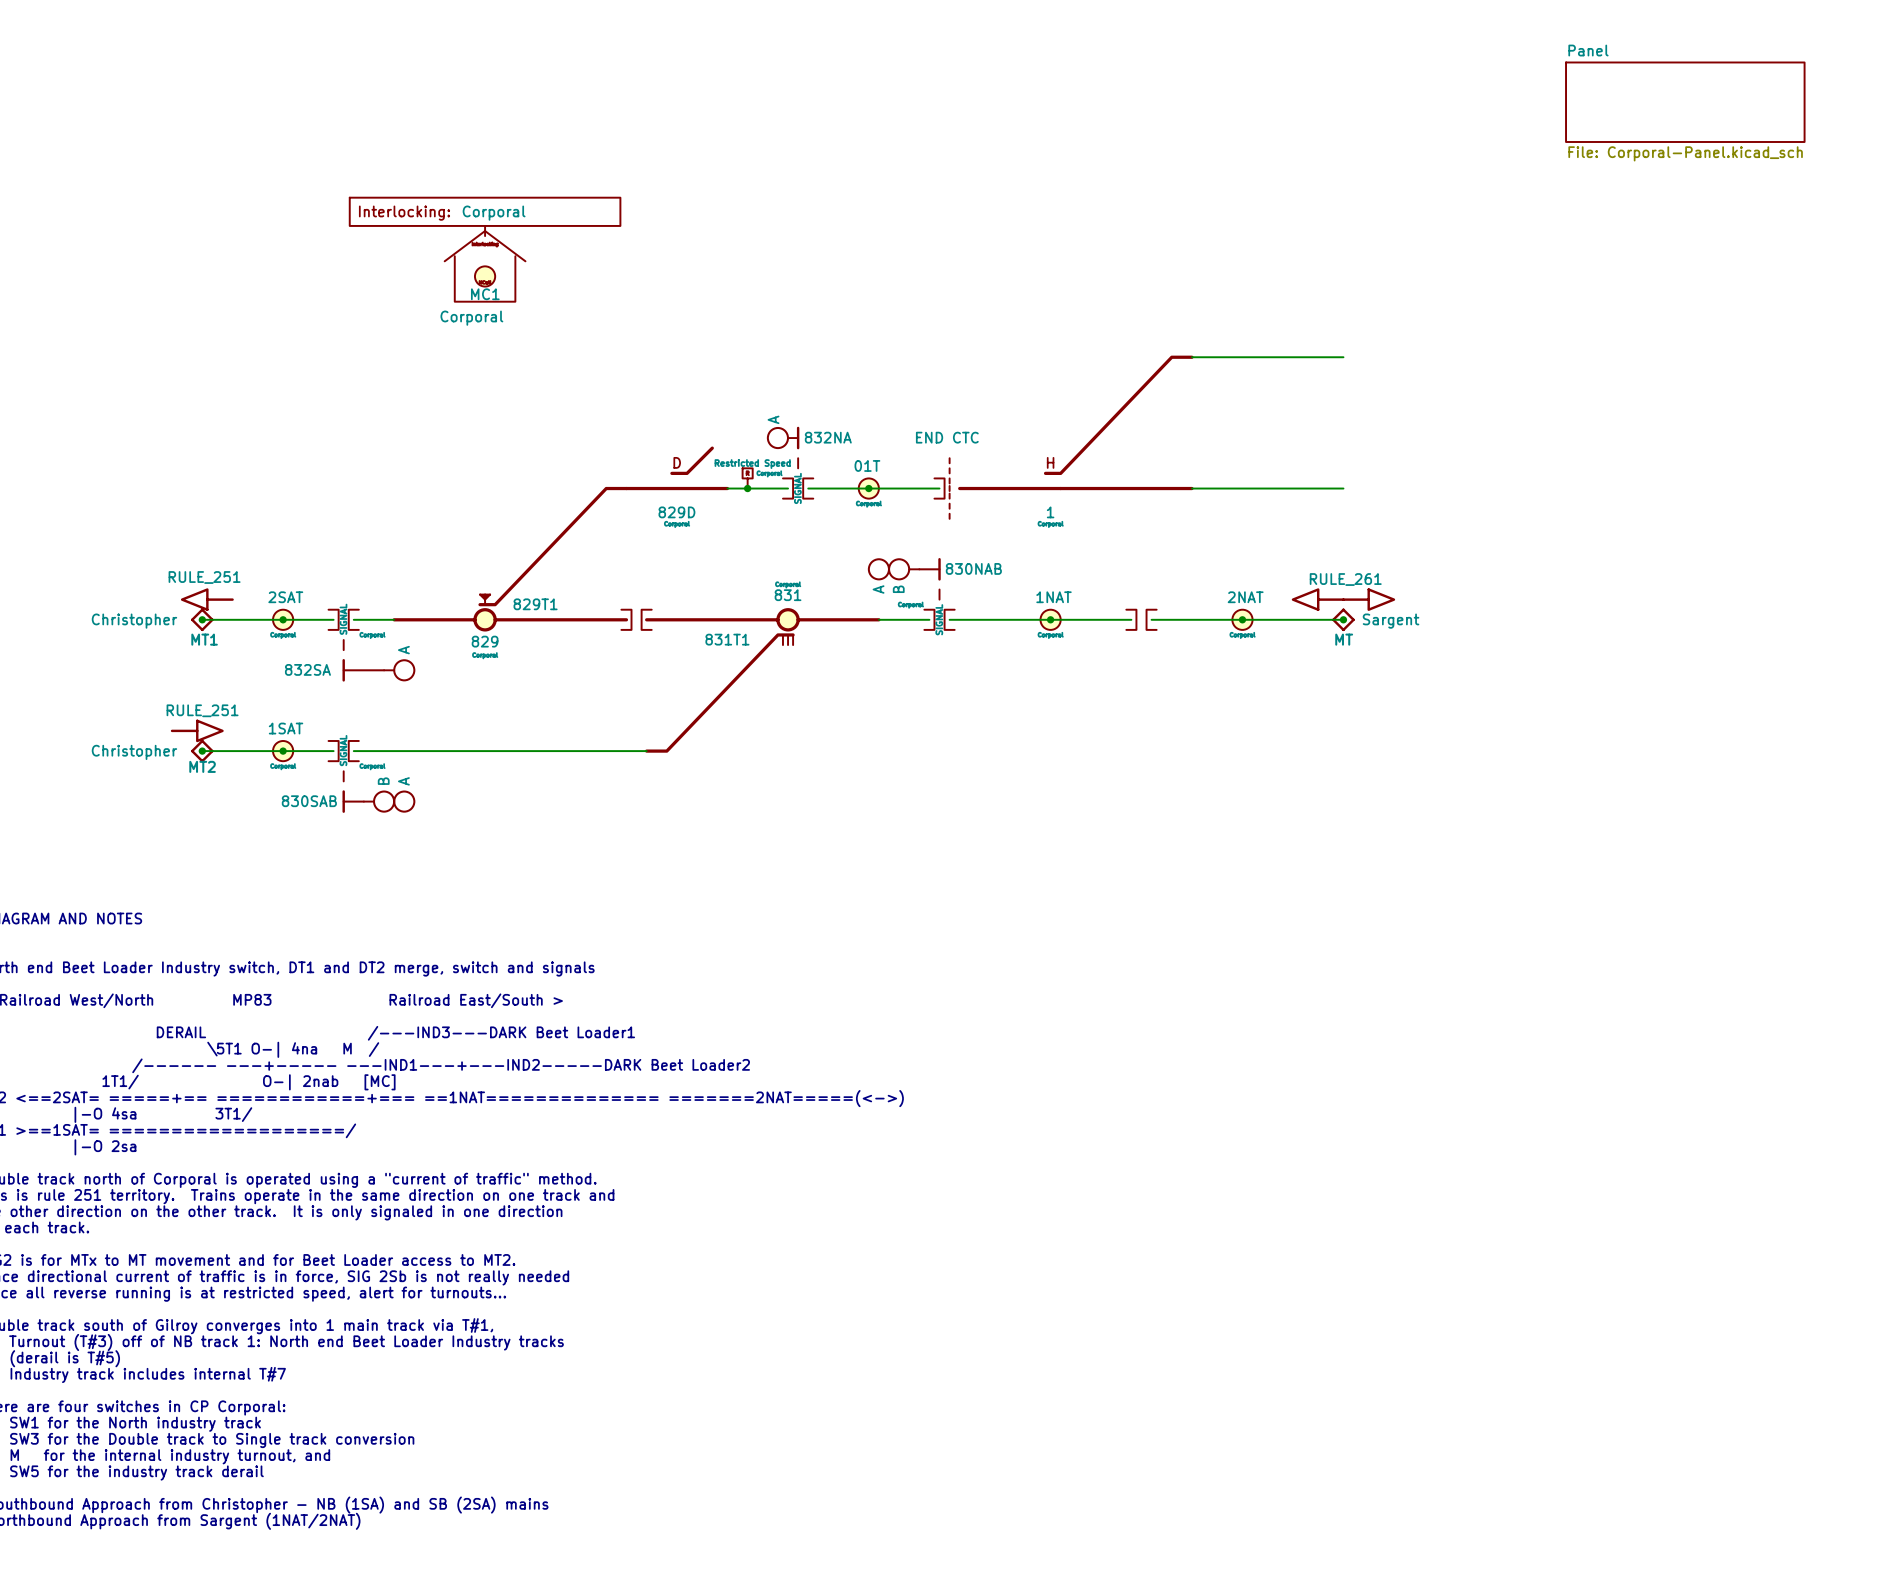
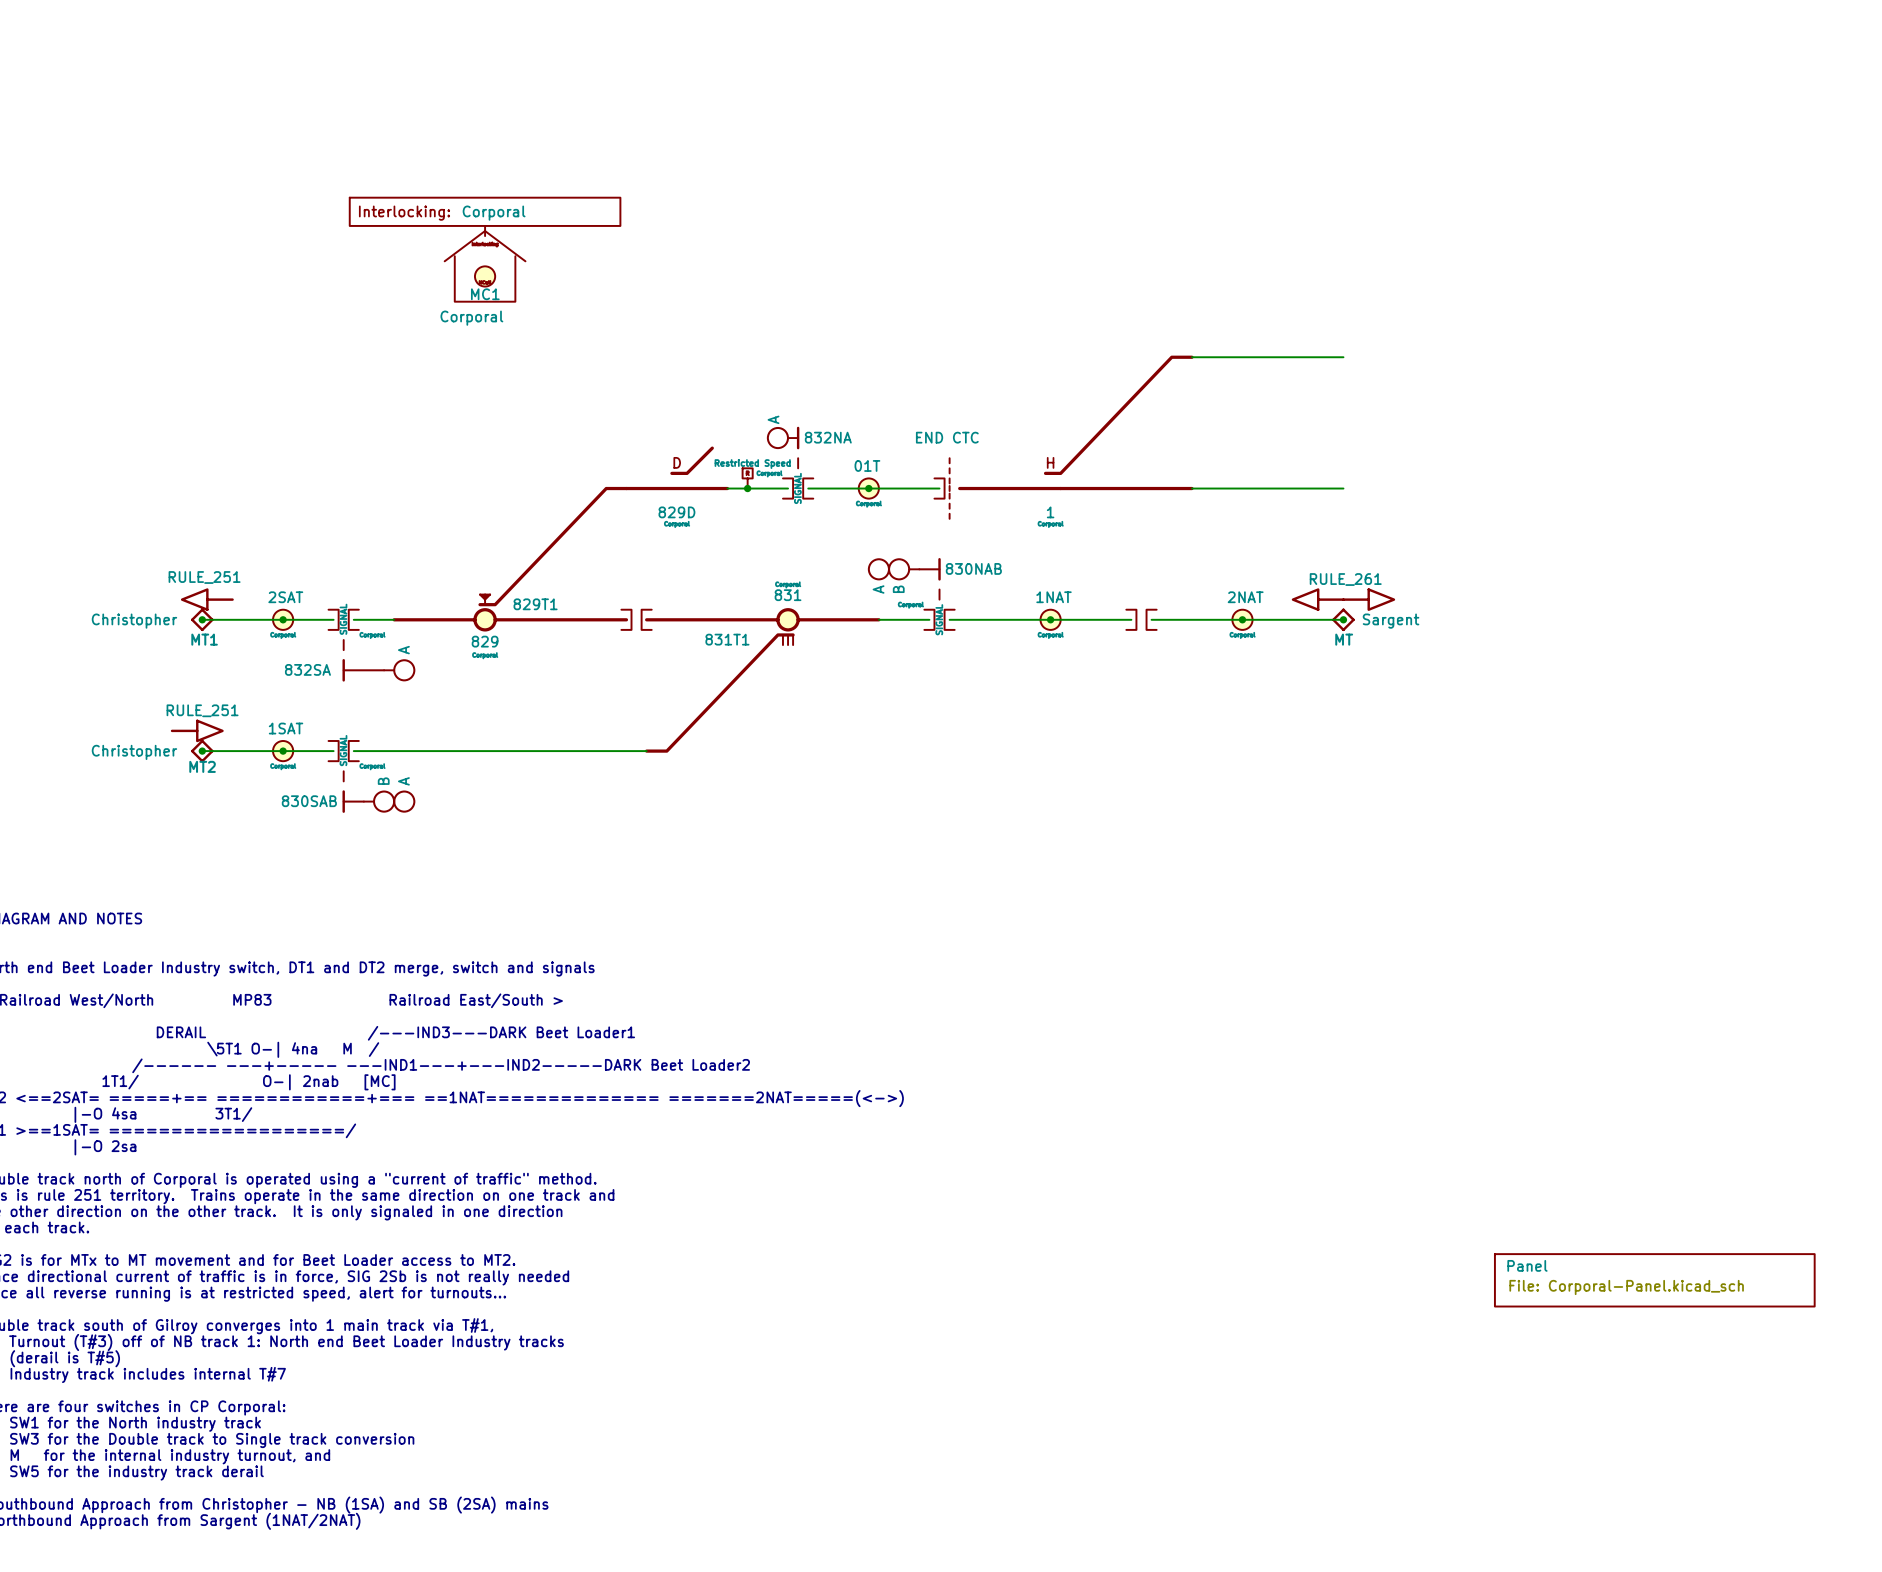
sheet Panel: File: Corporal-Panel.kicad_sch (1685, 102) -> none
sheet Panel: none -> File: Corporal-Panel.kicad_sch (1654, 1280)

